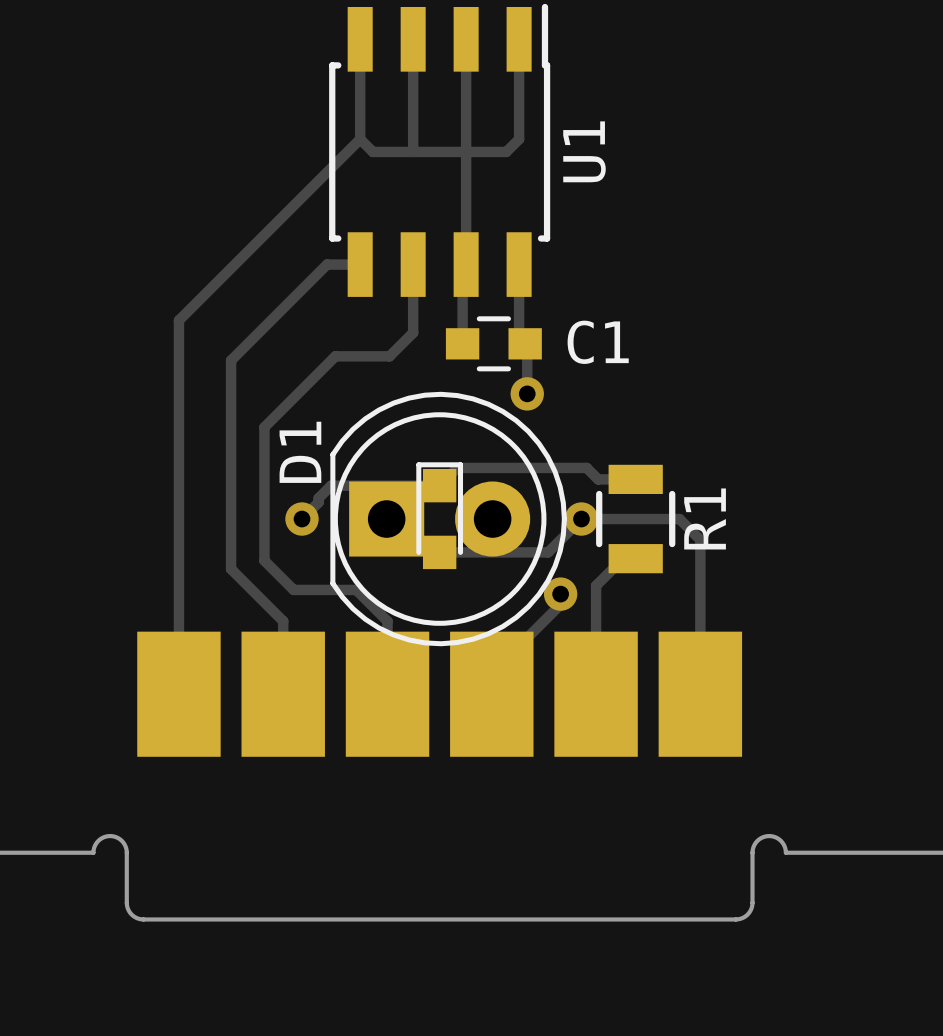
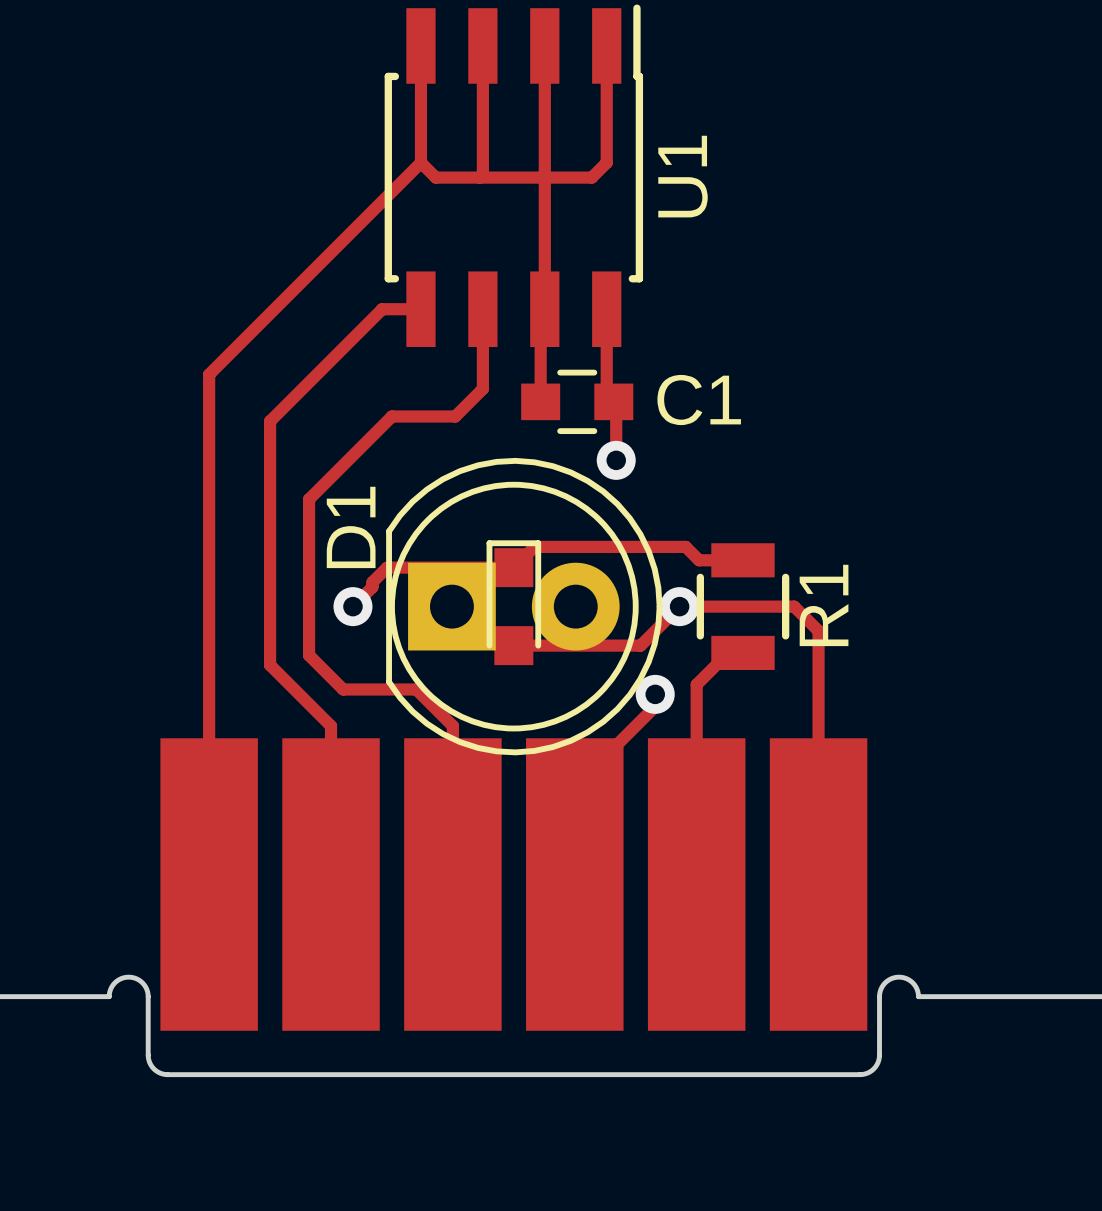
part: (439, 694) -> none
part: none -> (513, 884)

